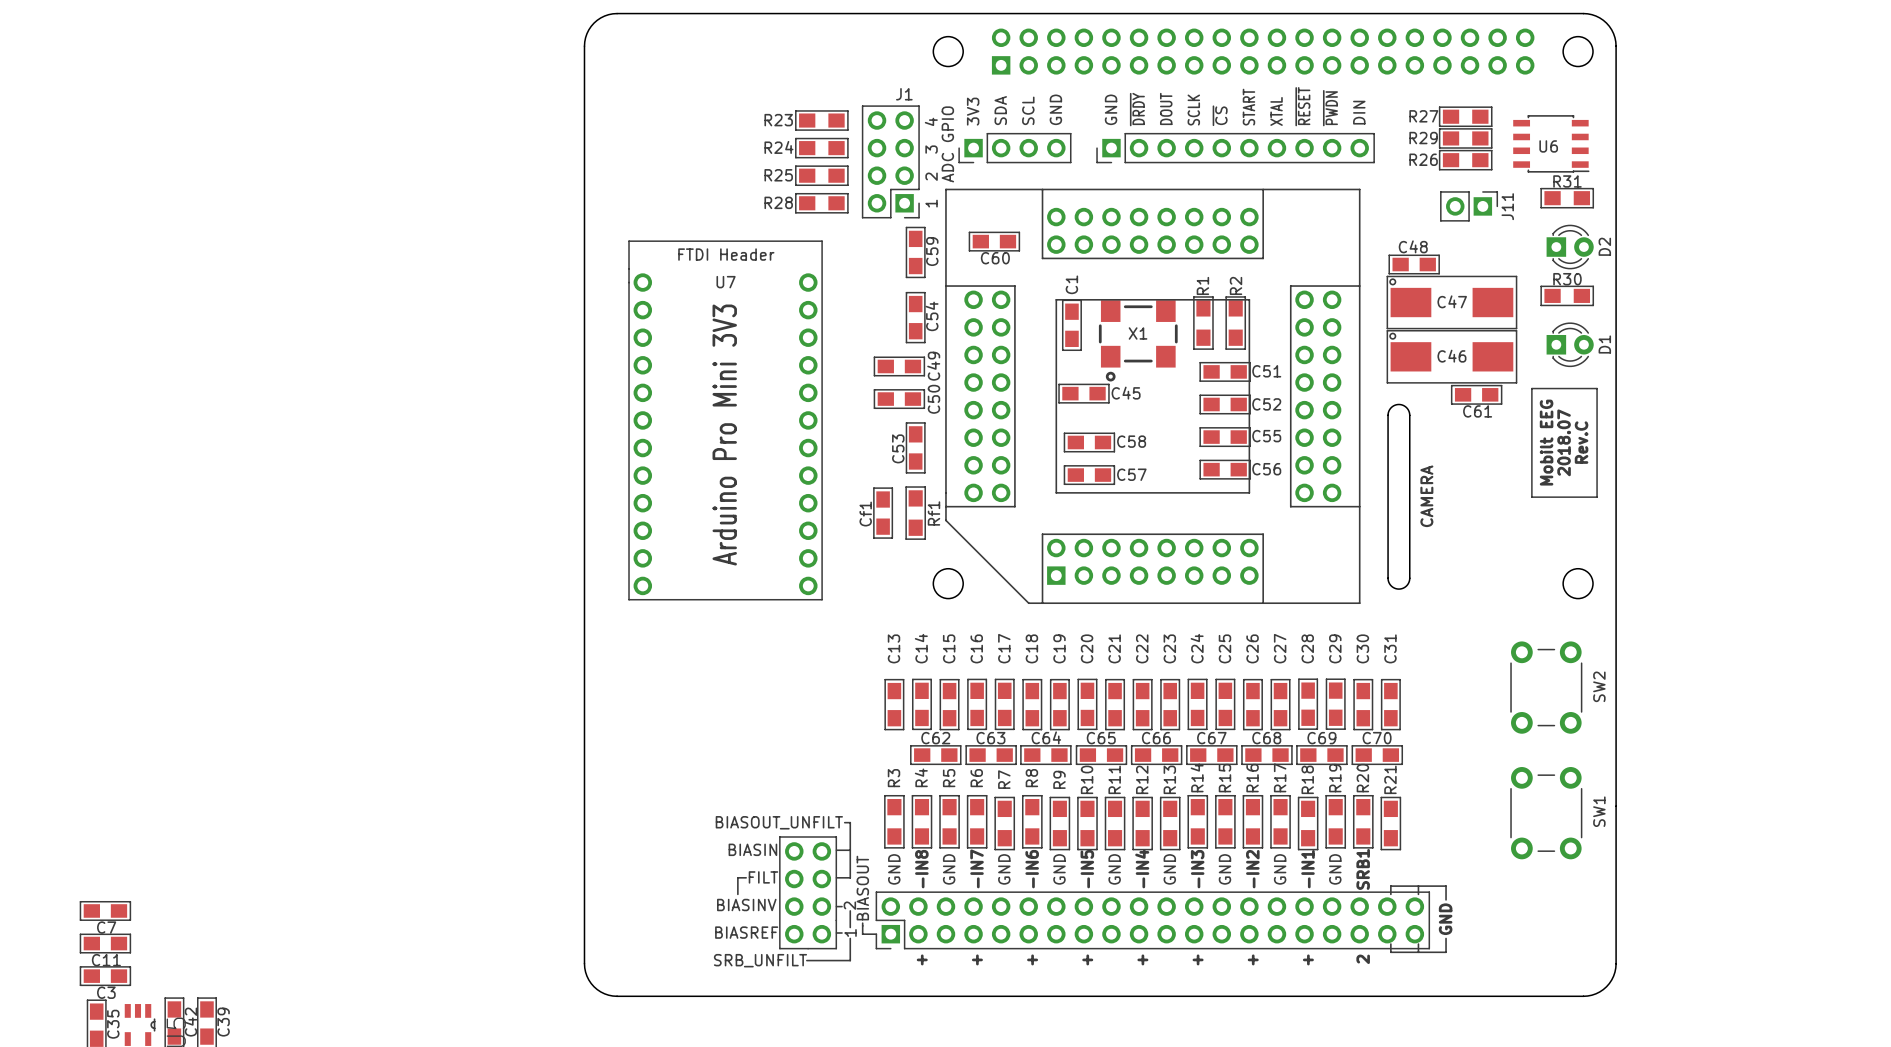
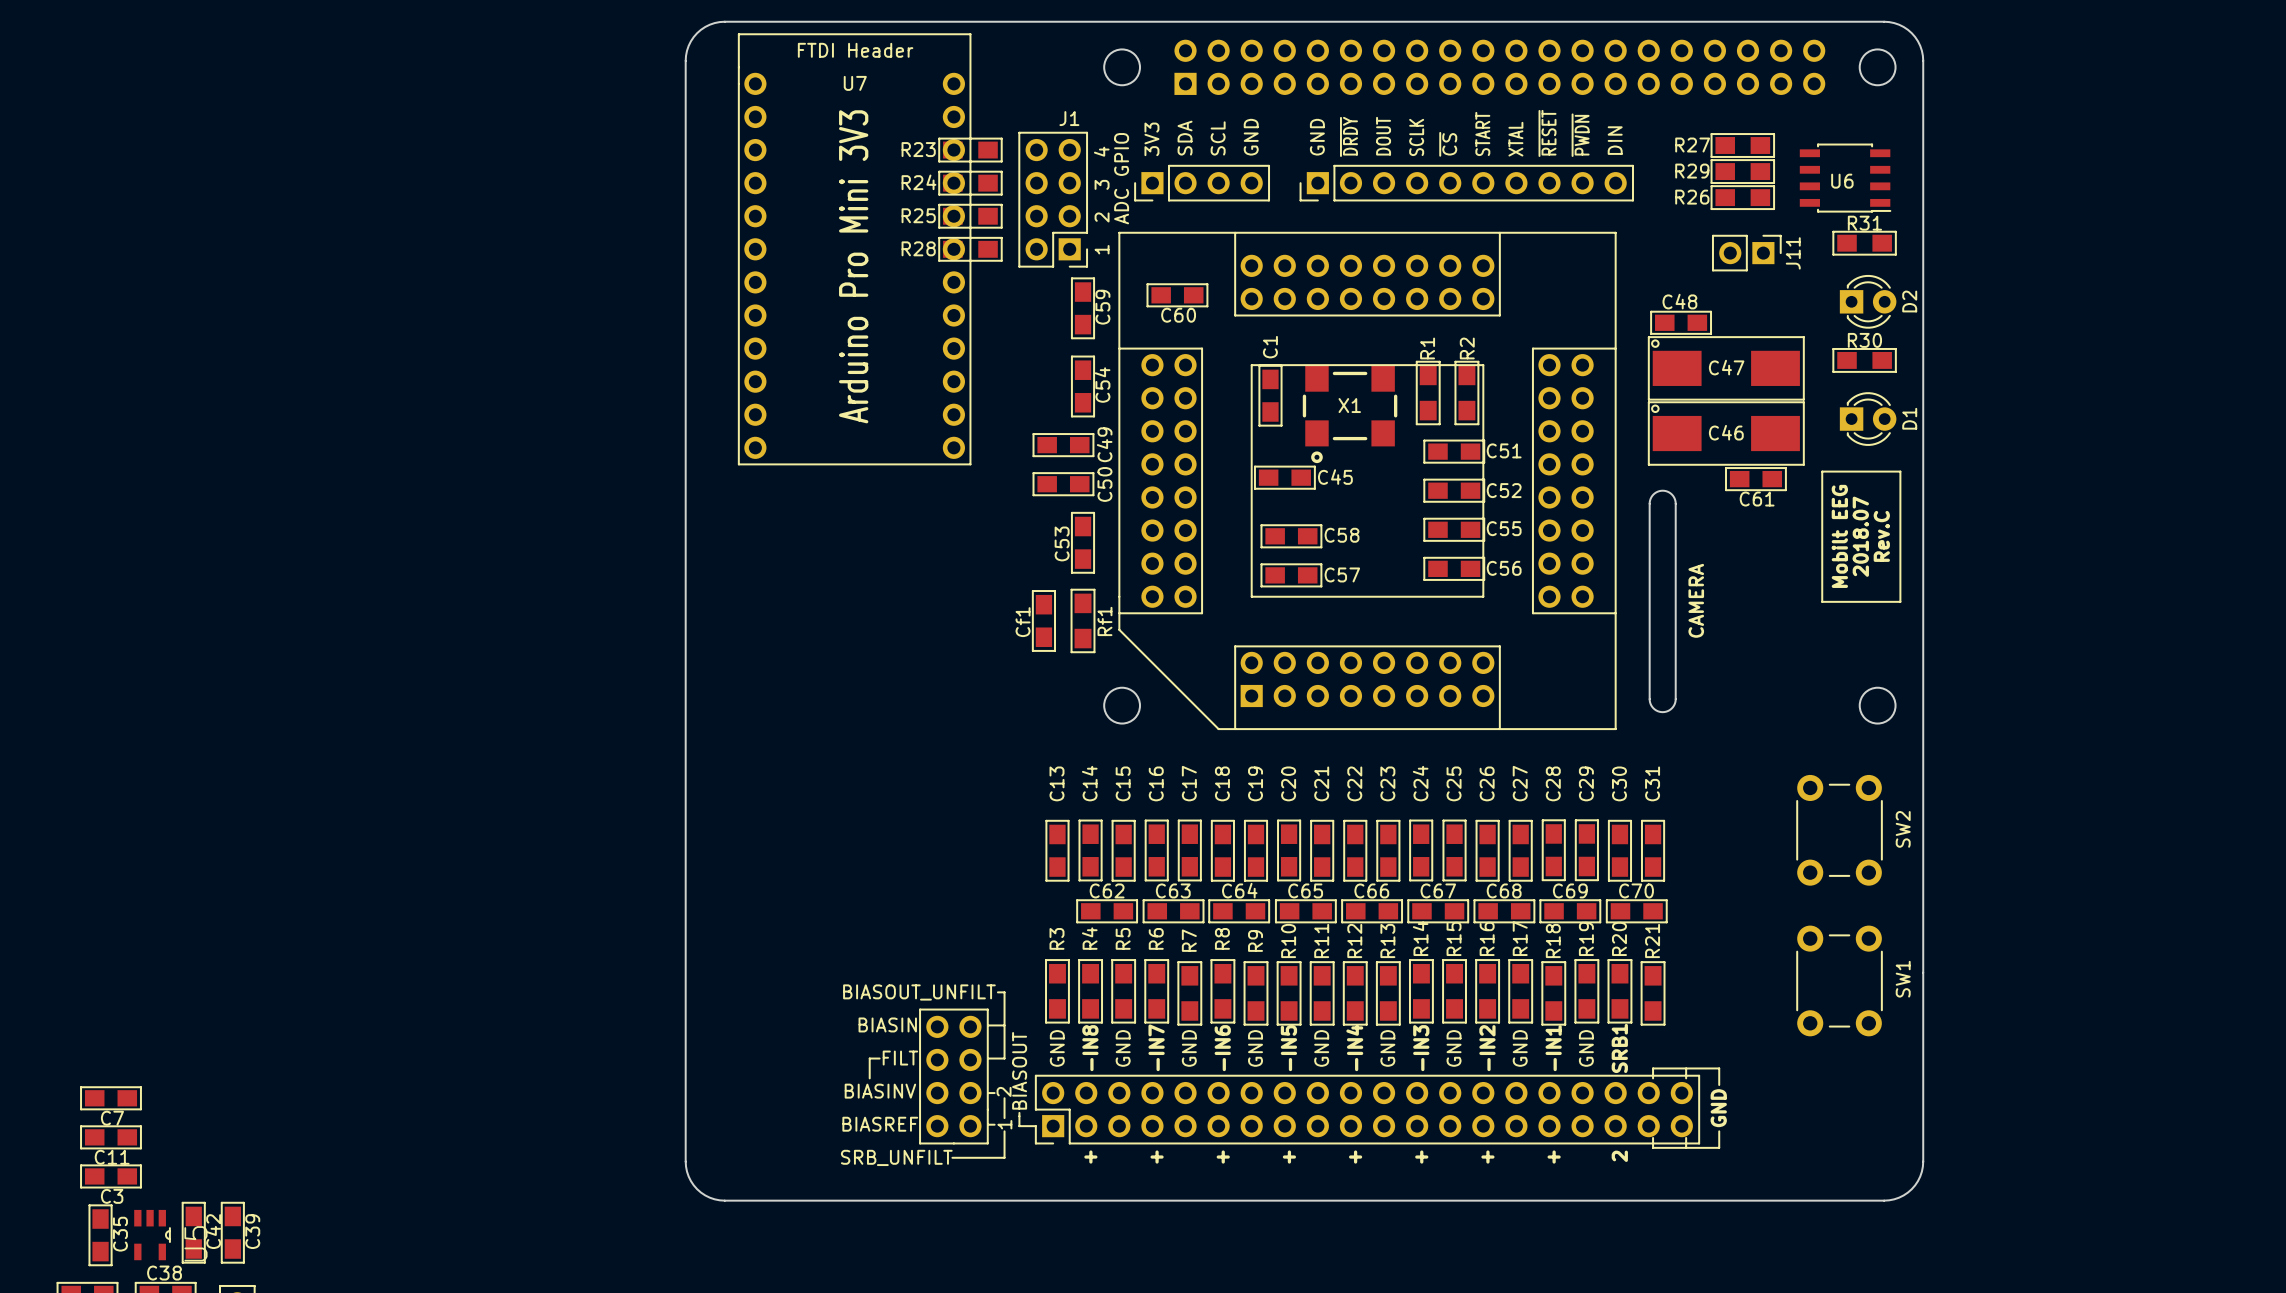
U7 position: (725, 420) -> (854, 249)

